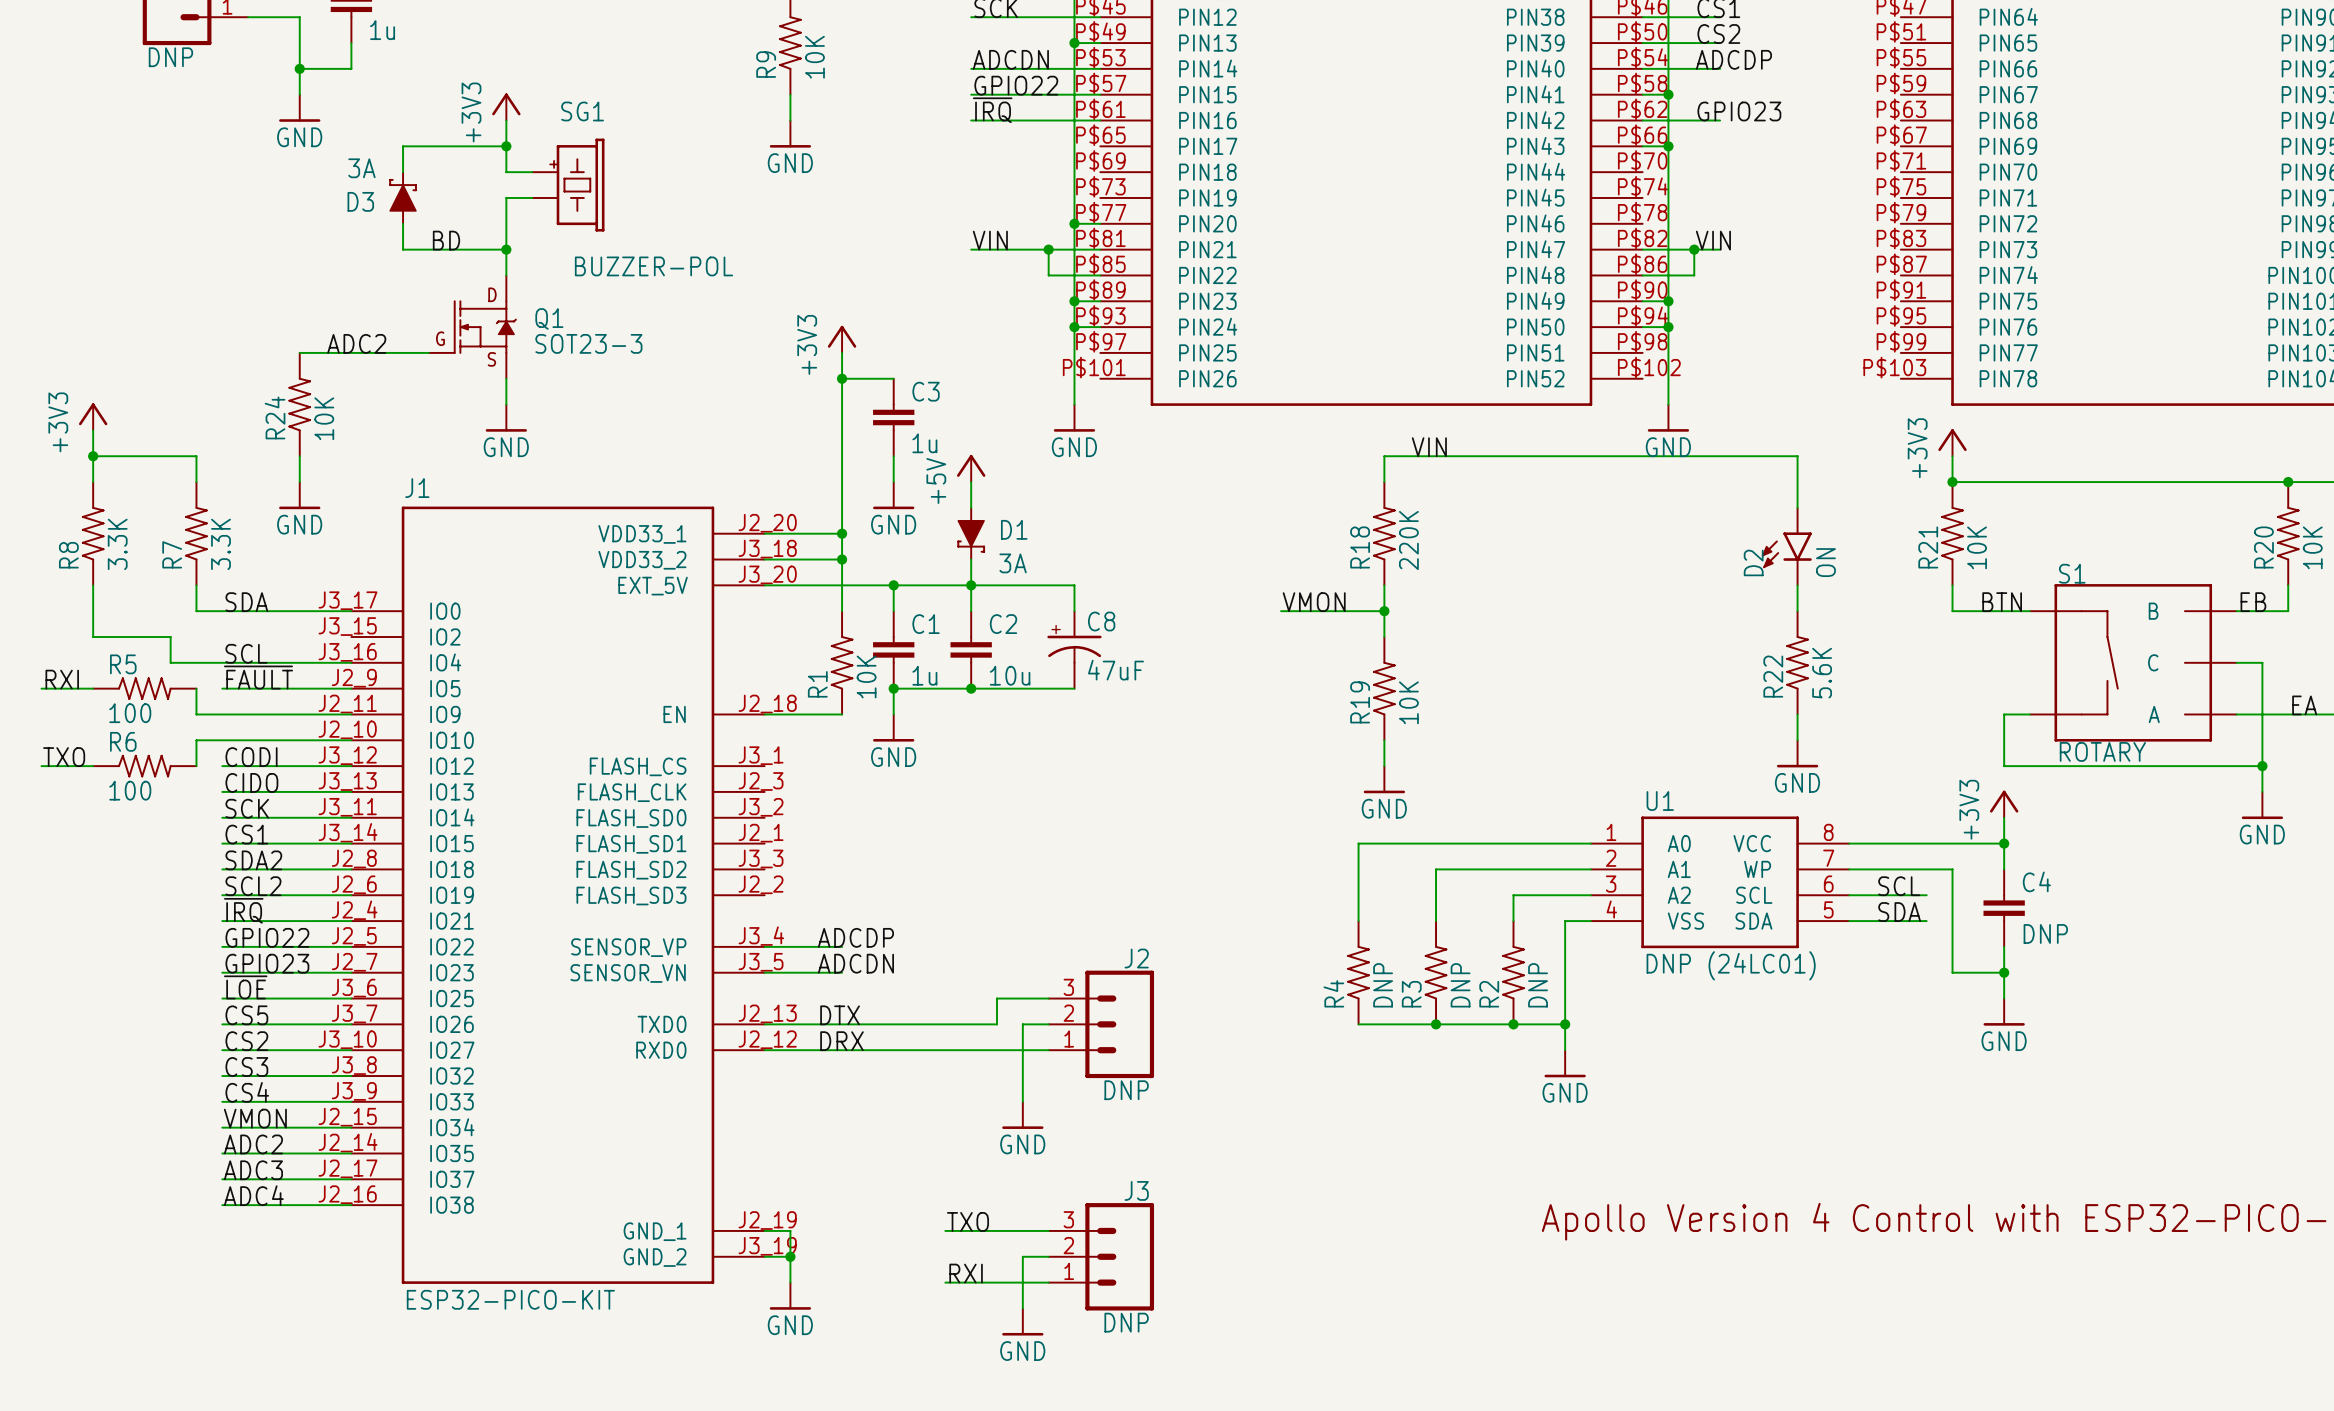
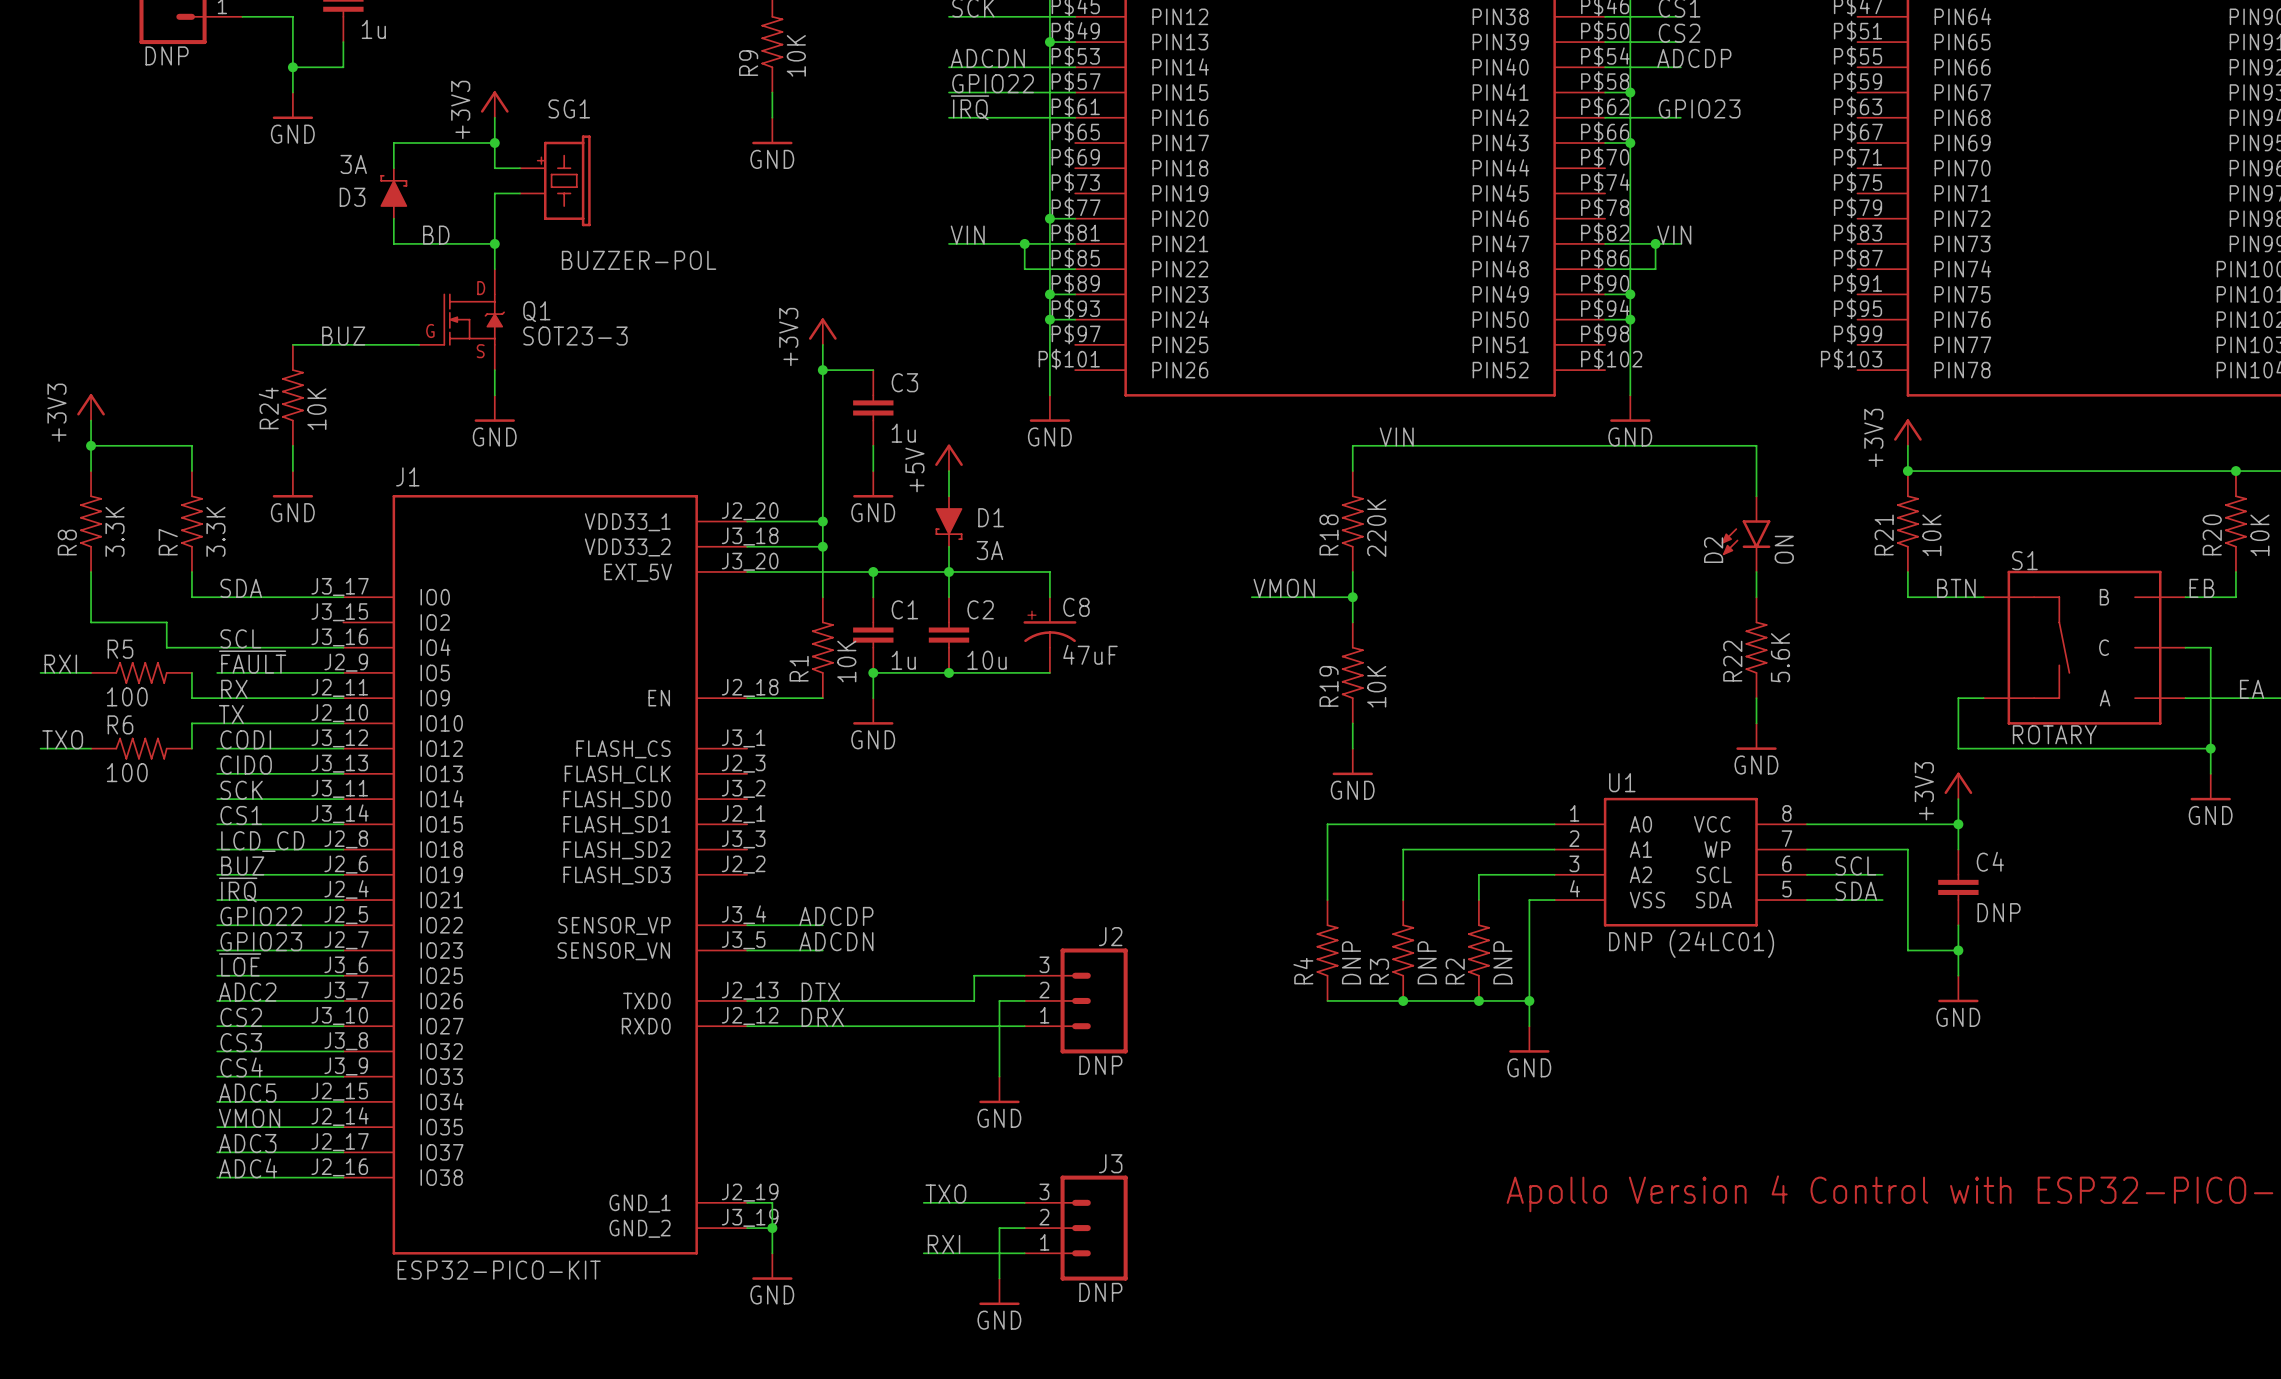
label: ADC2 (356, 343) -> BUZ (343, 336)
label: none -> RX (234, 689)
label: none -> TX (231, 714)
label: SDA2 (253, 860) -> LCD_CD (262, 841)
label: SCL2 (253, 886) -> BUZ (242, 865)
label: CS5 (246, 1015) -> ADC2 (247, 992)
label: VMON (255, 1118) -> ADC5 (247, 1093)
label: ADC2 (253, 1144) -> VMON (249, 1118)

